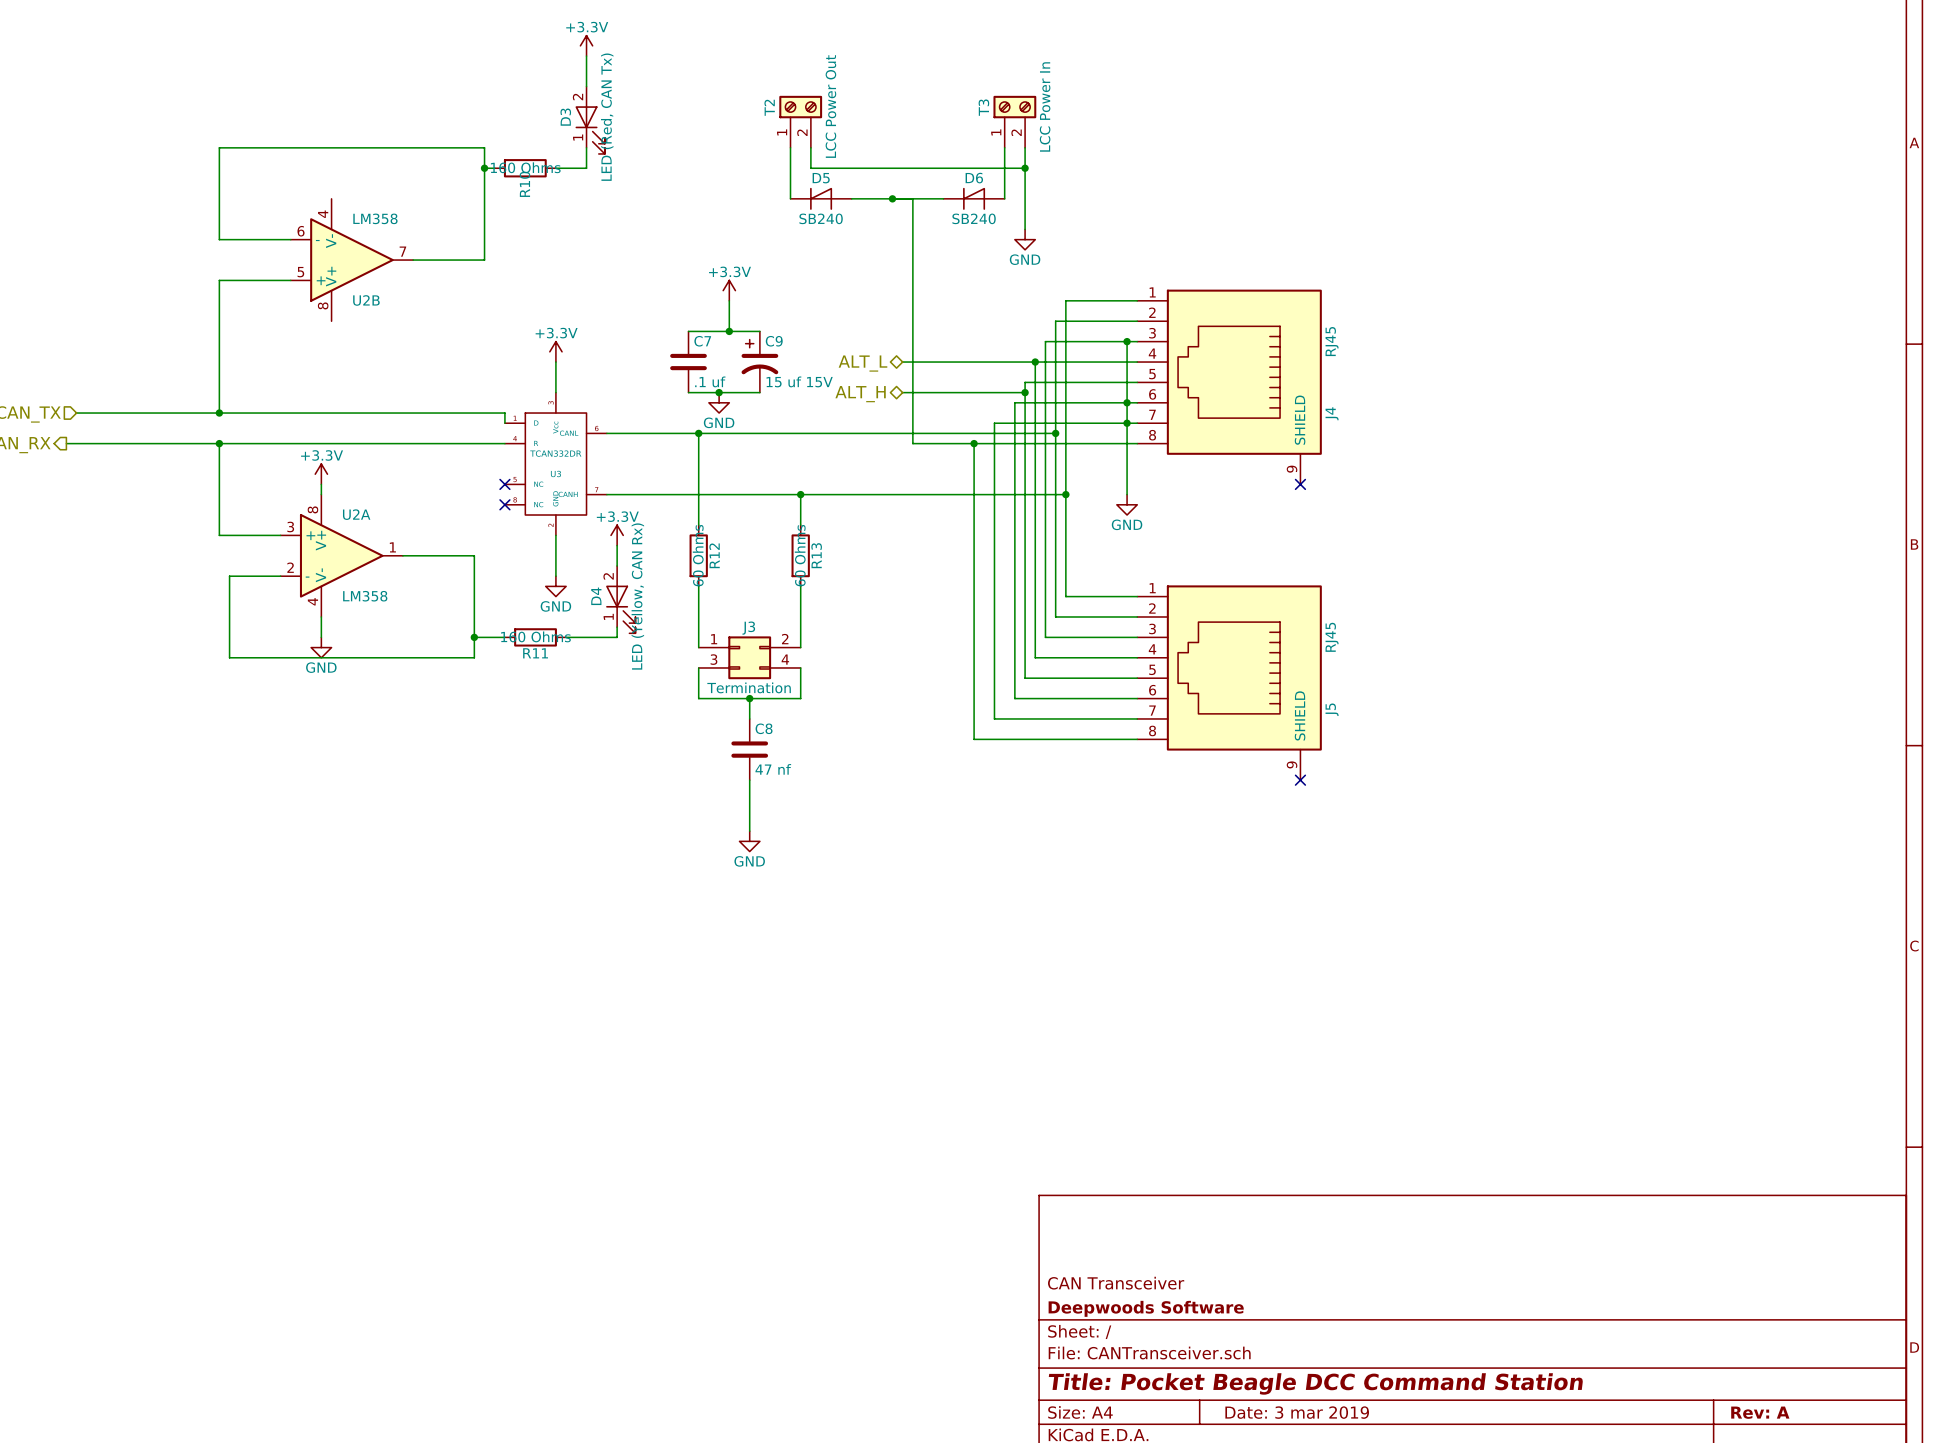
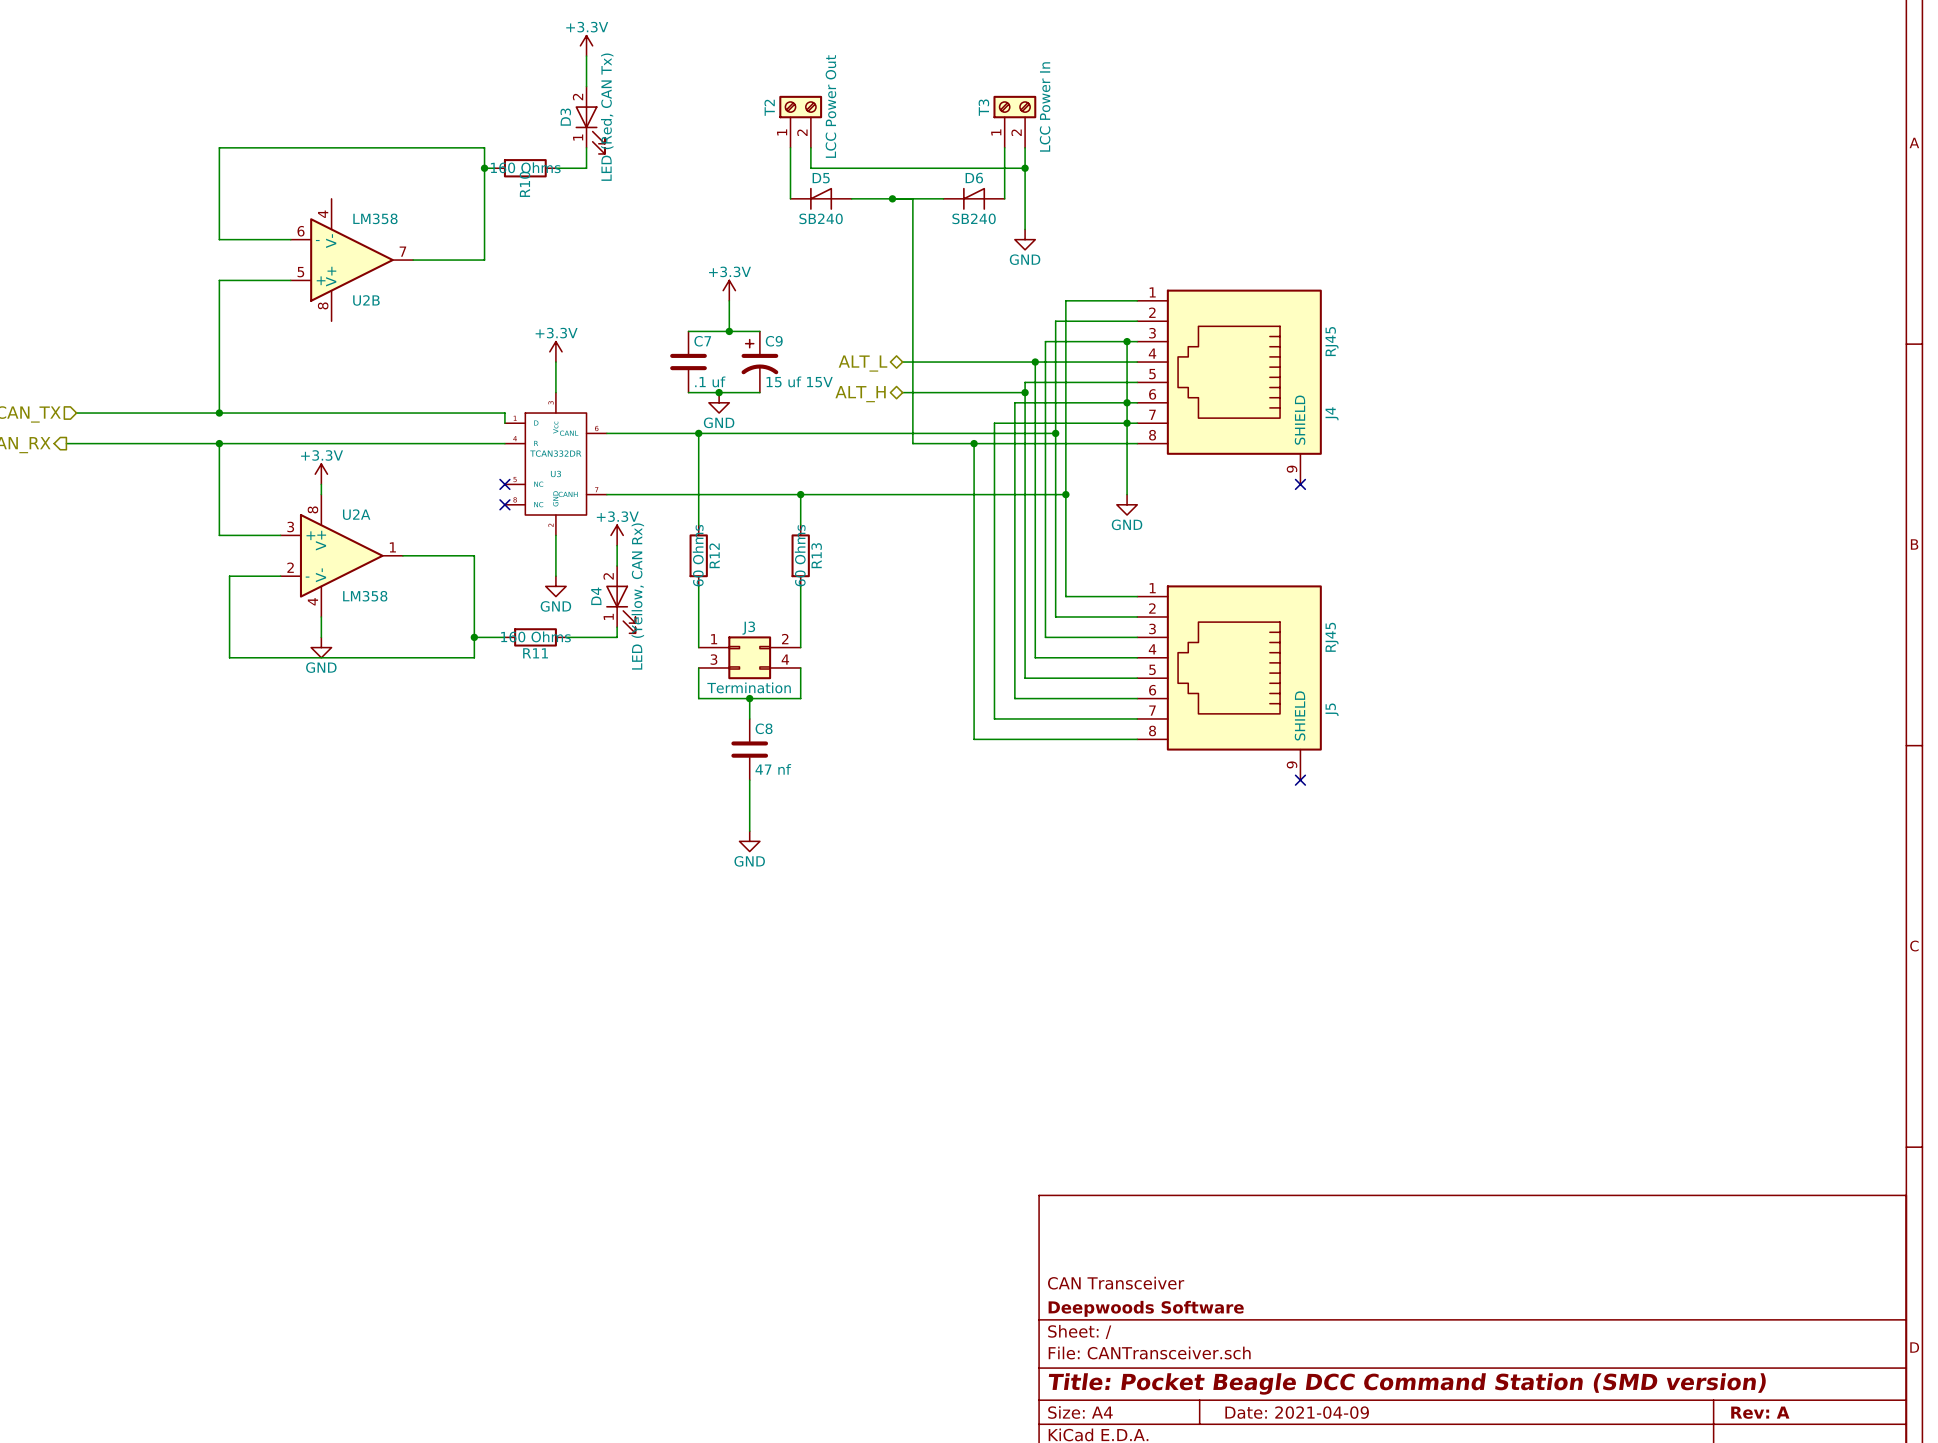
title block: Title: Pocket Beagle DCC Command Station (1315, 1383) -> Title: Pocket Beagle DCC Command Station (SMD version) (1407, 1383)
title block: Date: 3 mar 2019 (1297, 1412) -> Date: 2021-04-09 (1297, 1412)

